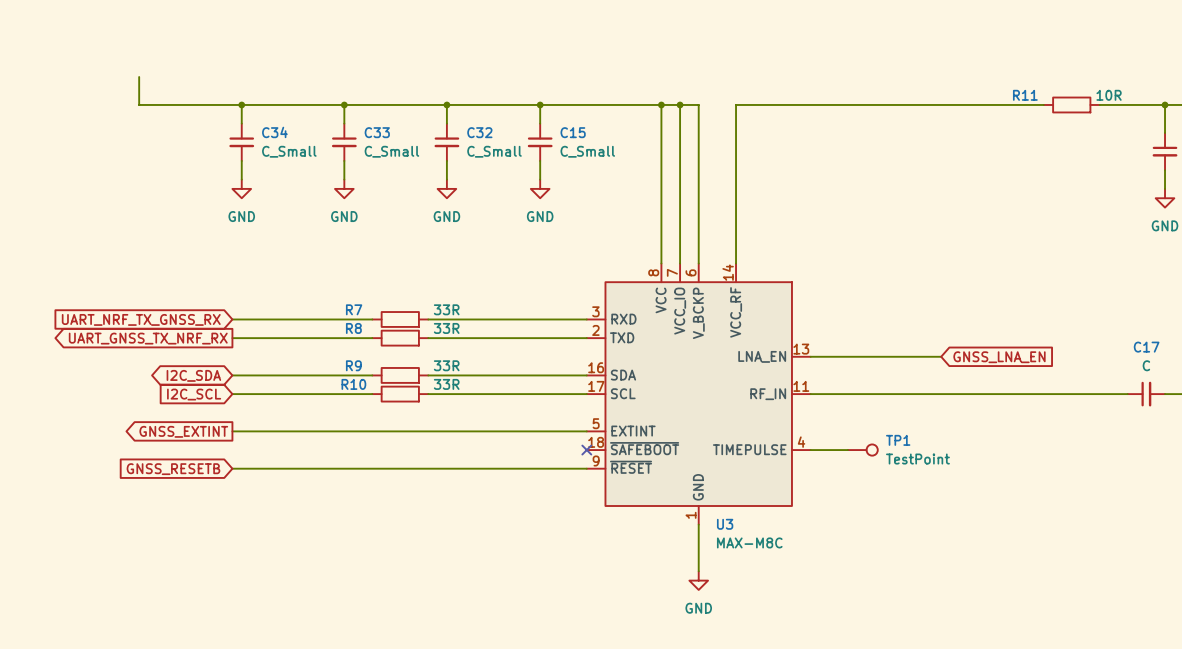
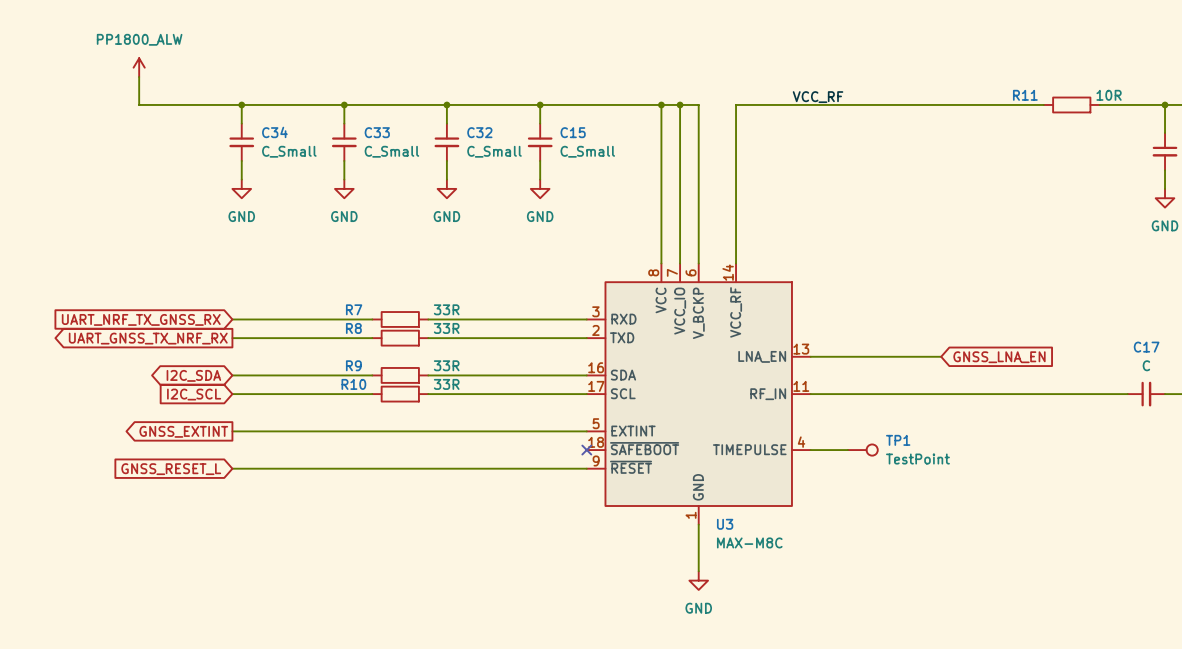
power symbol: none -> PP1800_ALW (139, 67)
label: none -> VCC_RF (818, 97)
global label: GNSS_RESETB (173, 469) -> GNSS_RESET_L (171, 469)

